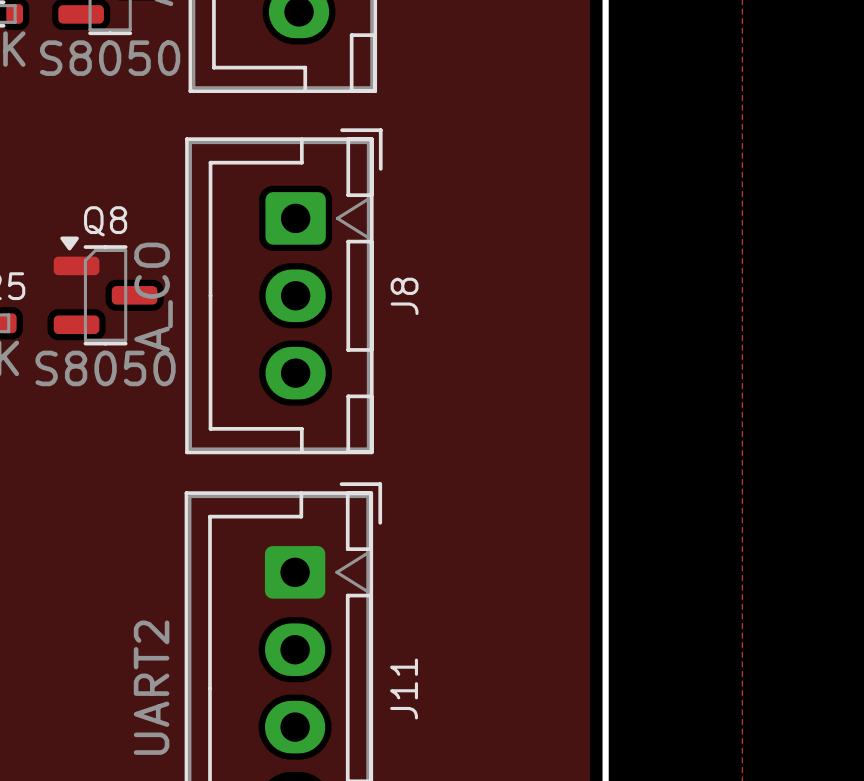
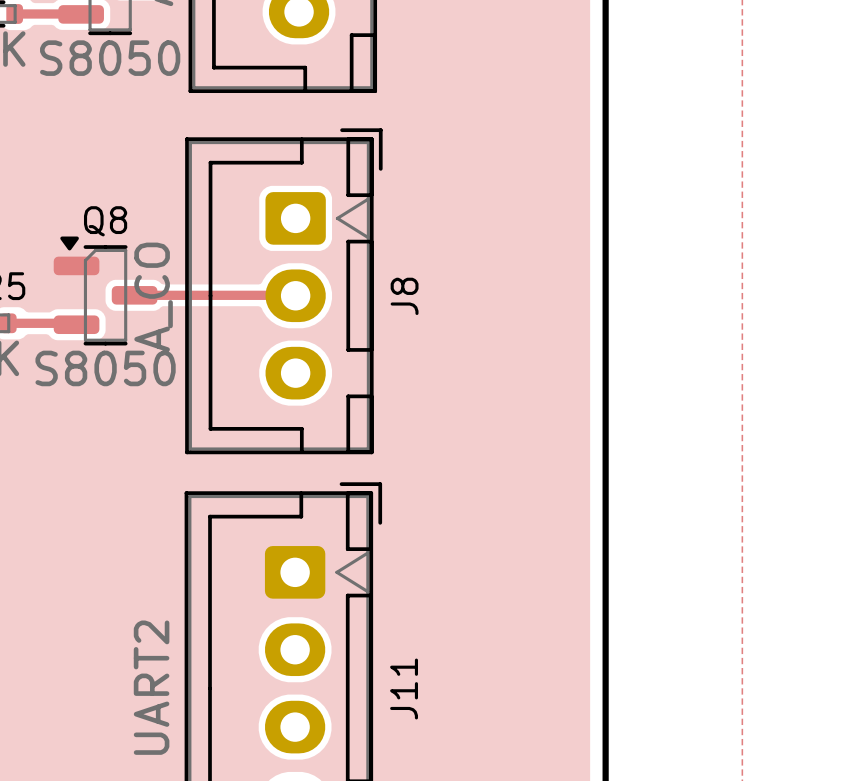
track: none -> (17, 13) (80, 13)
track: none -> (134, 295) (295, 295)
track: none -> (10, 323) (76, 324)

